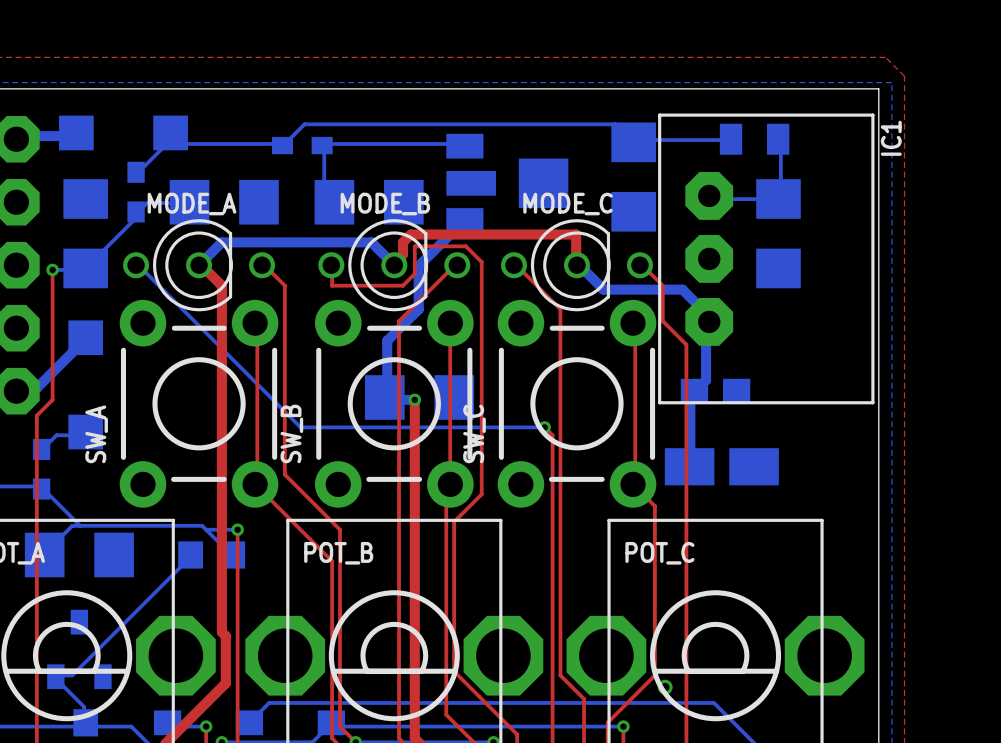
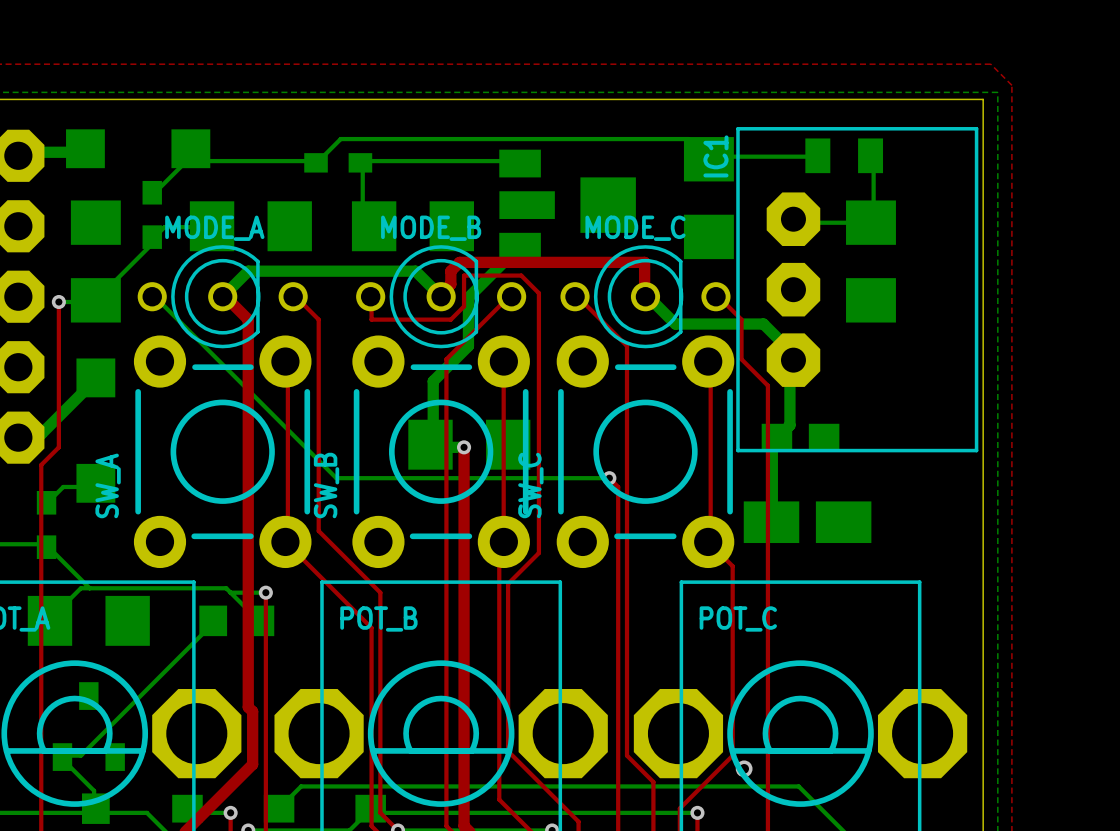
IC1 name position: IC1 (891, 138) -> IC1 (715, 156)

